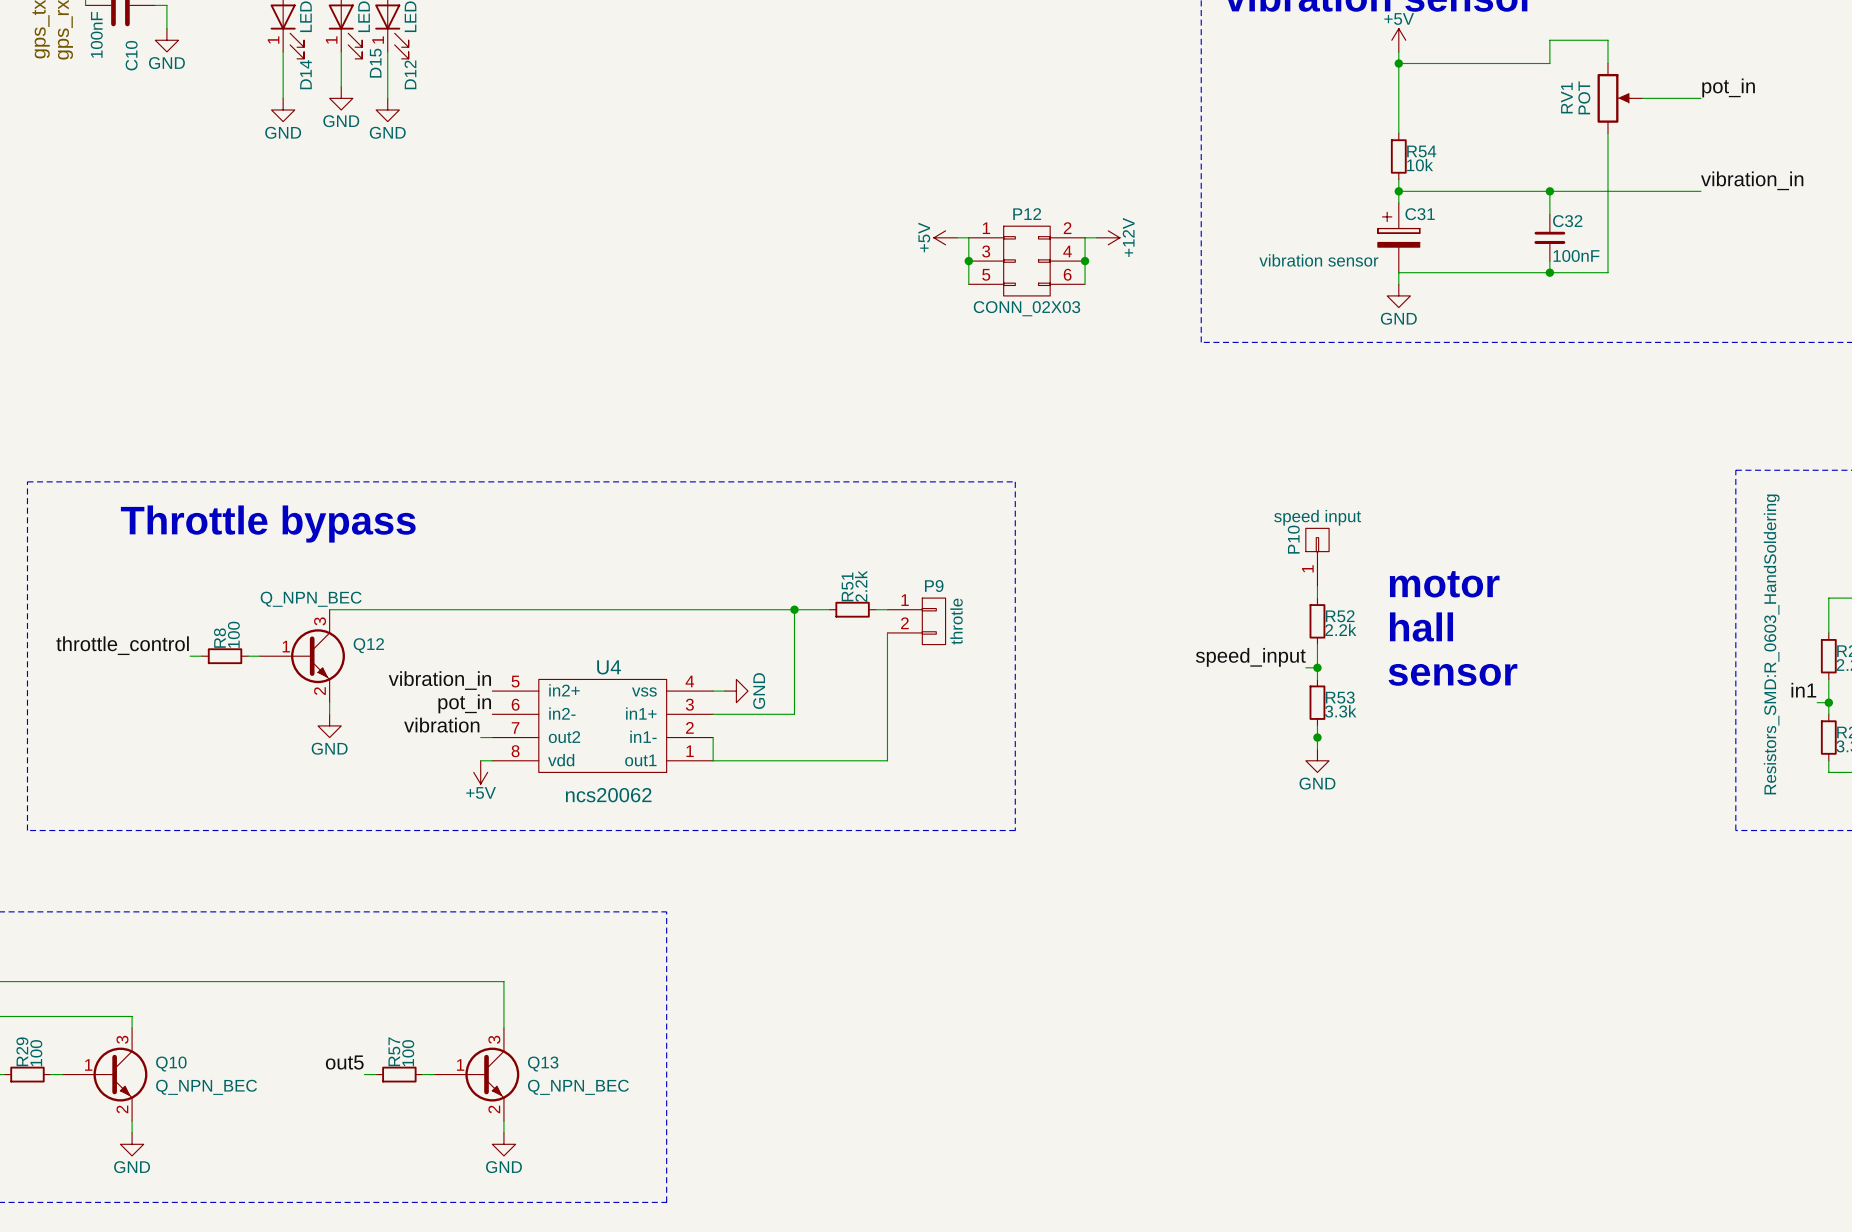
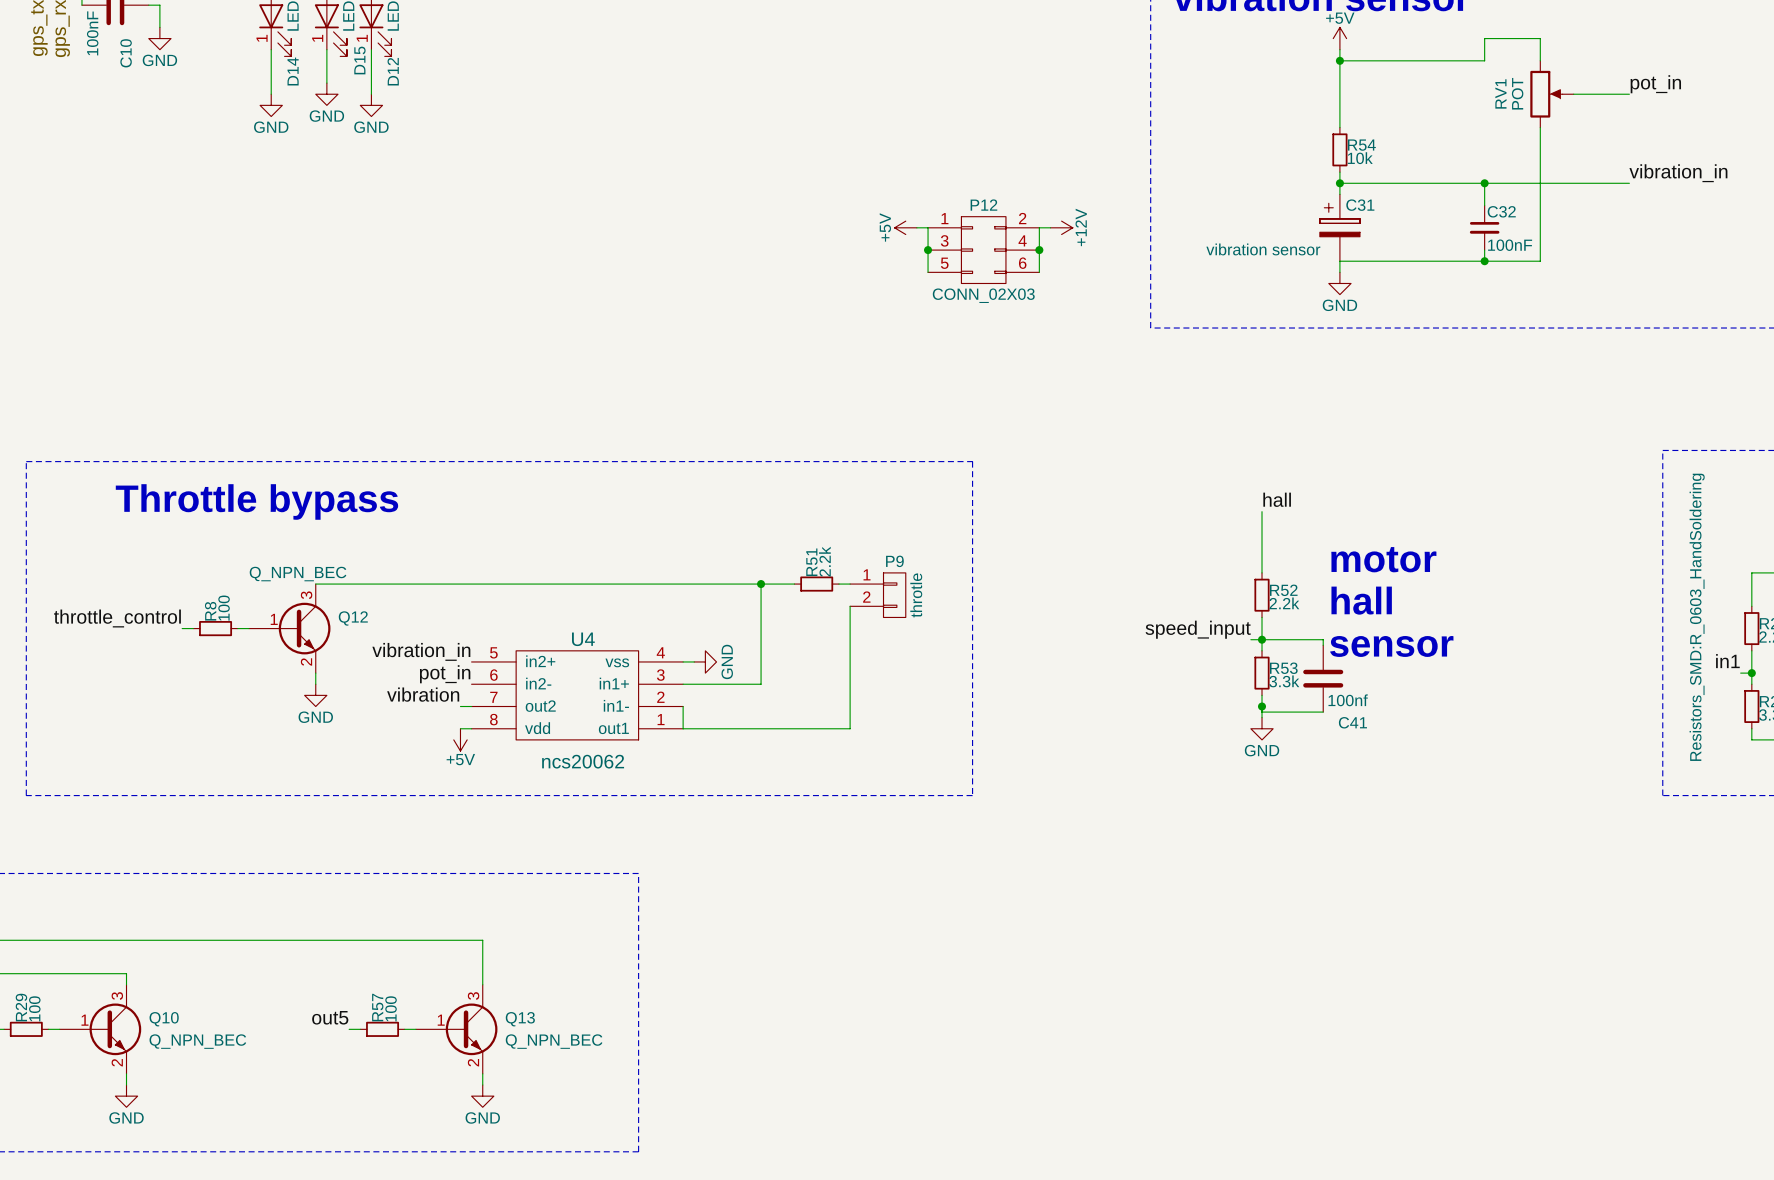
label: none -> hall (1277, 499)
P10: speed input (1317, 557) -> none
wire: none -> (1262, 639) (1323, 639) (1323, 645)
C41: none -> 100nf (1323, 678)
wire: none -> (1262, 712) (1323, 712)

